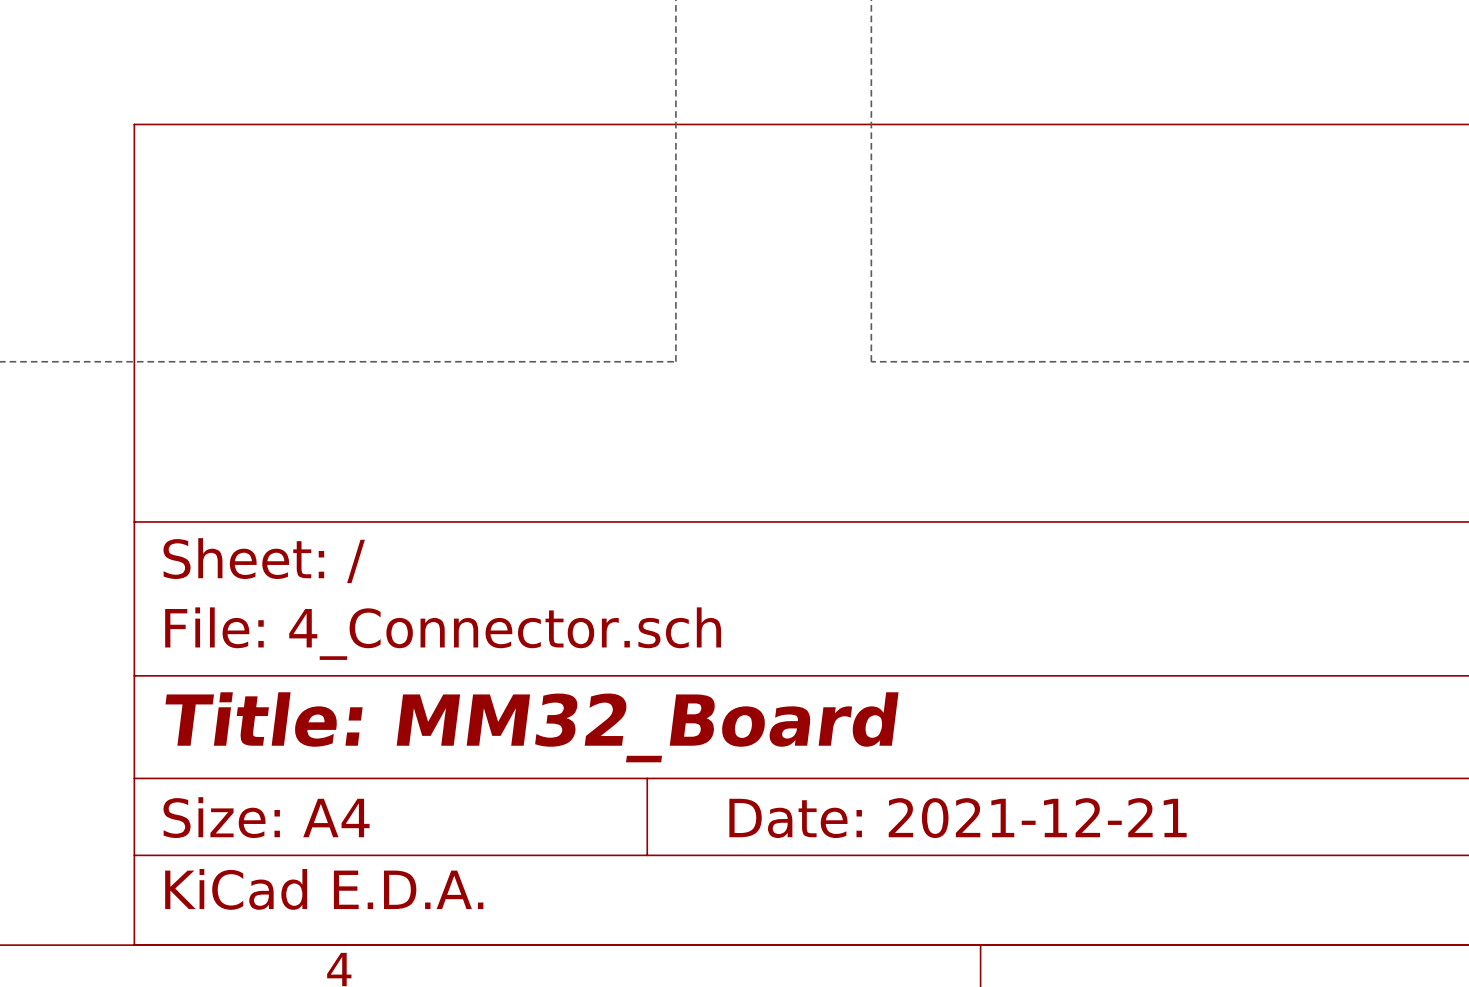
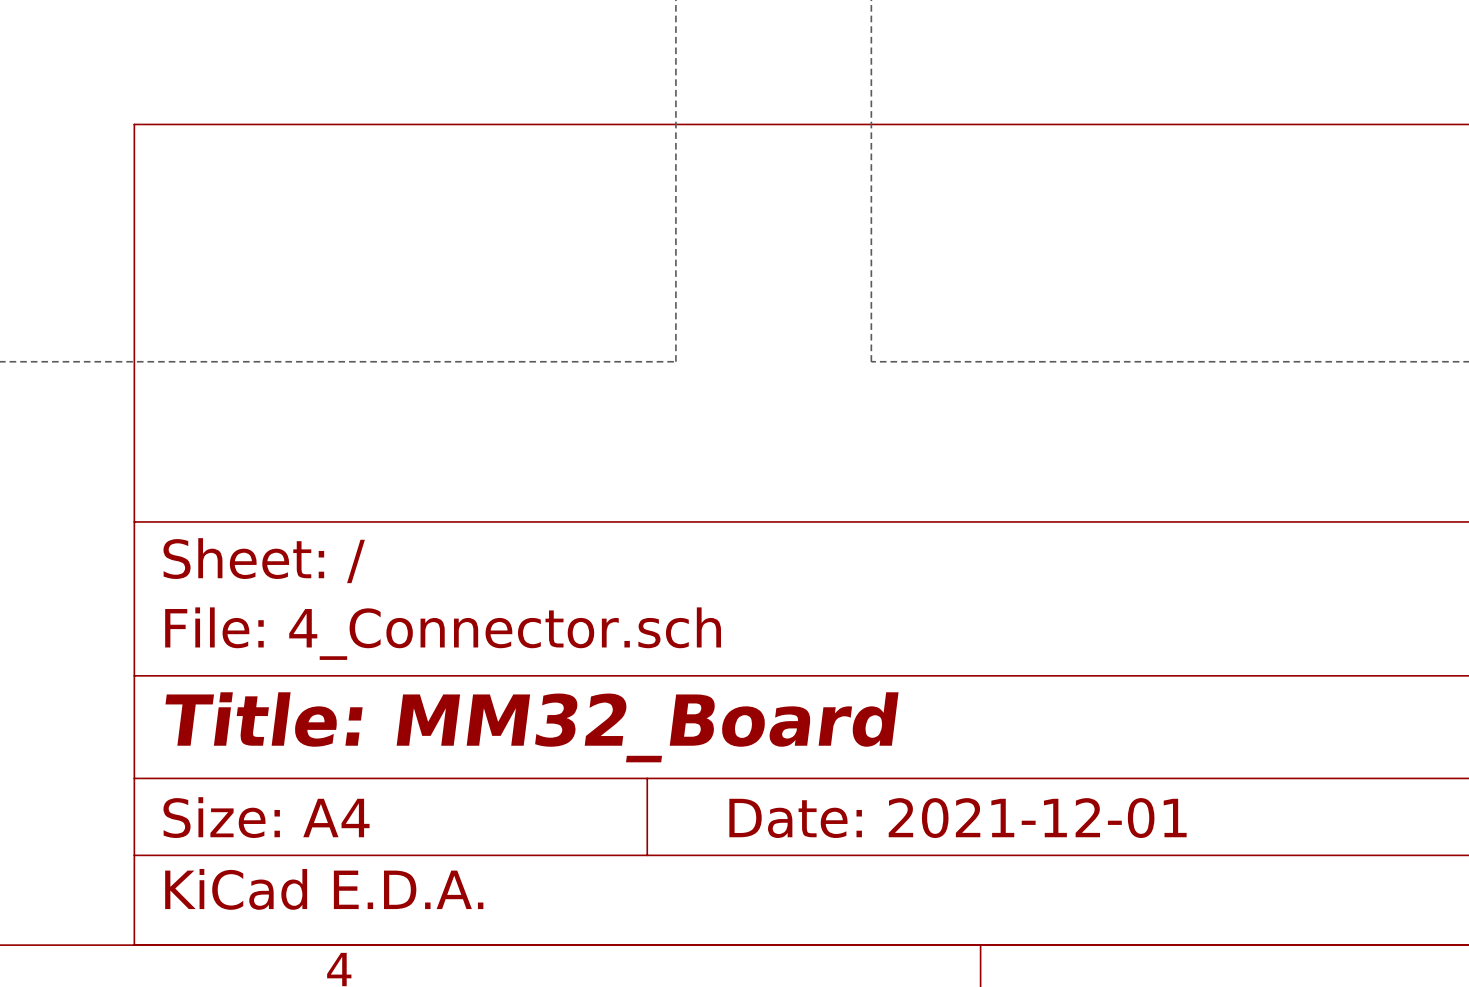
title block: Date: 2021-12-21 (958, 818) -> Date: 2021-12-01 (958, 818)

